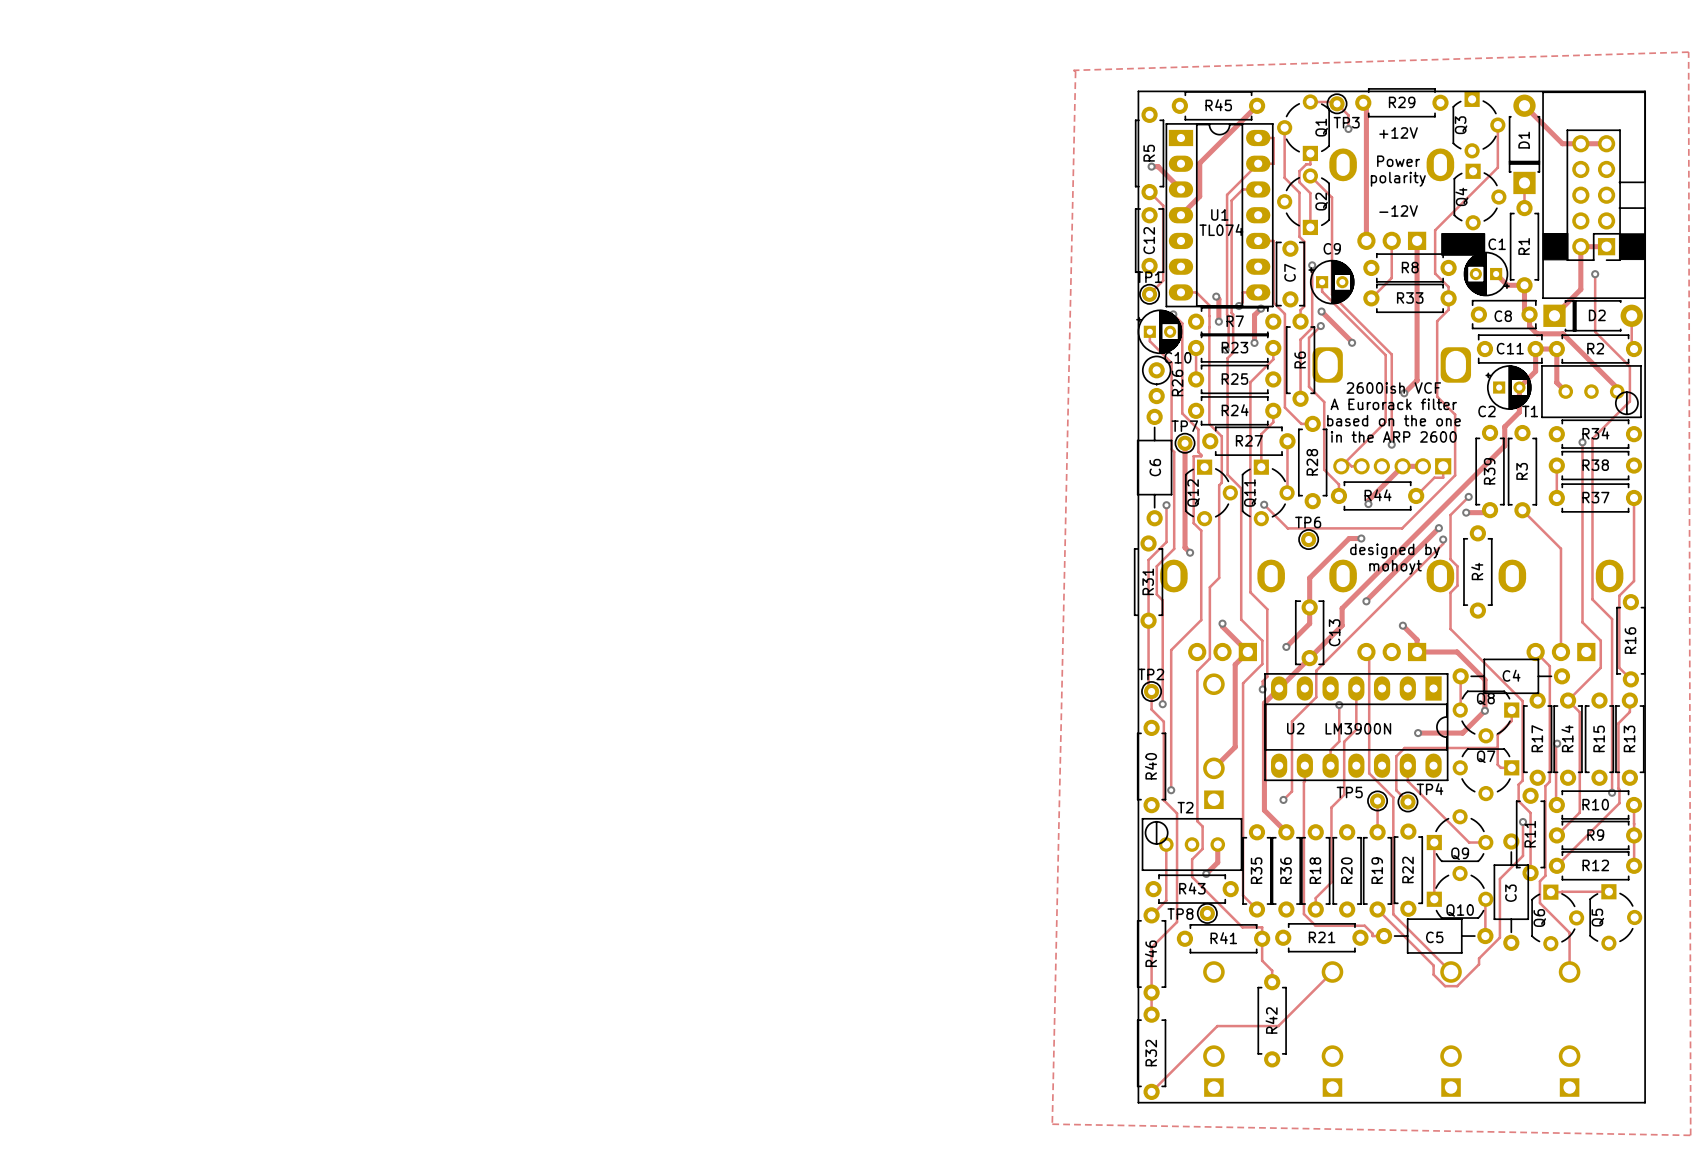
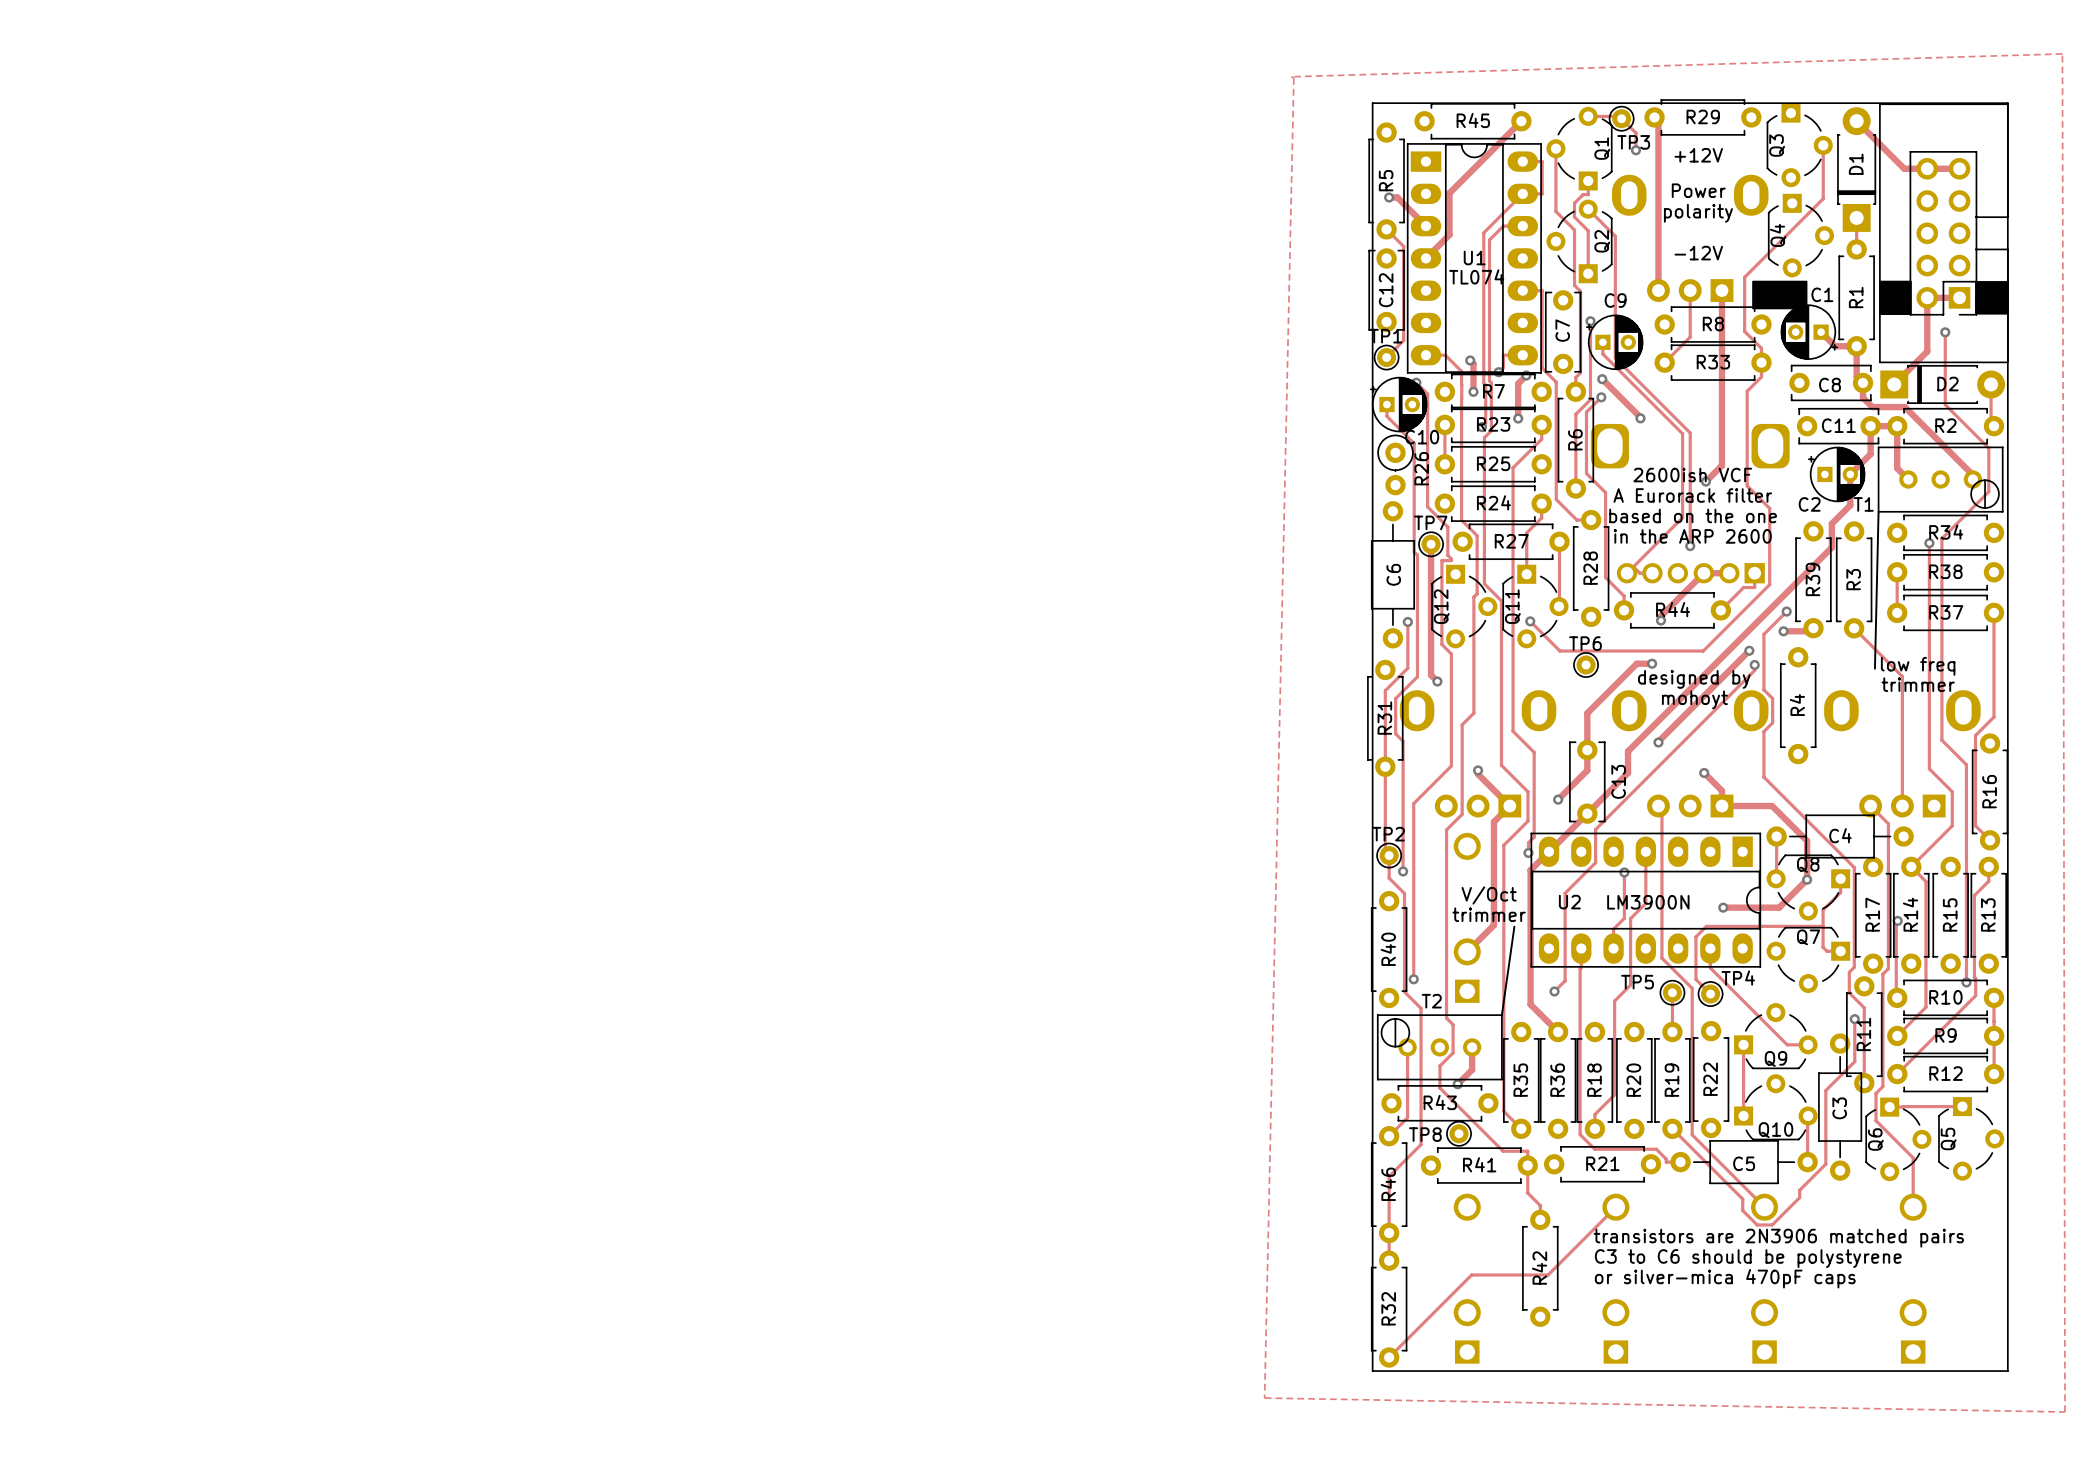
line: none -> (1878, 511) (1874, 668)
text: none -> low freq (1918, 666)
text: none -> trimmer (1918, 684)
text: none -> V/Oct (1489, 895)
text: none -> trimmer (1489, 914)
line: none -> (1514, 926) (1501, 1015)
text: none -> transistors are 2N3906 matched pairs (1778, 1238)
text: none -> C3 to C6 should be polystyrene (1748, 1258)
text: none -> or silver-mica 470pF caps (1725, 1278)

